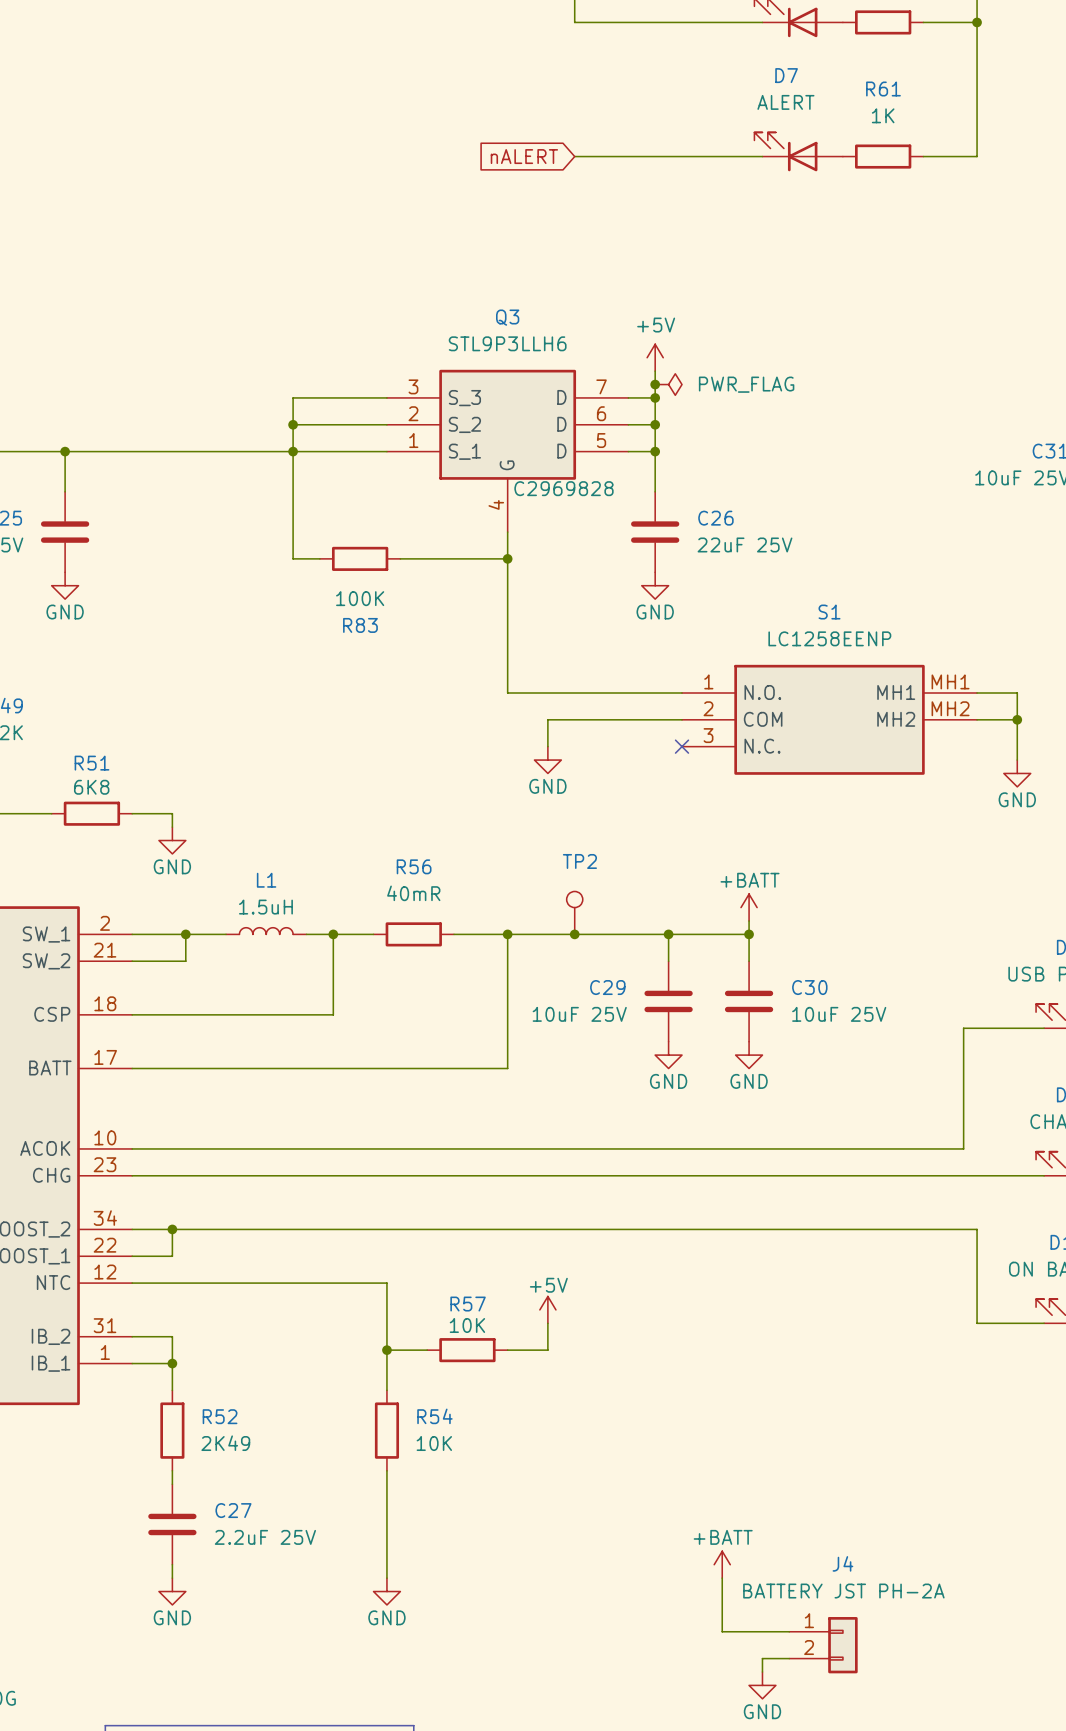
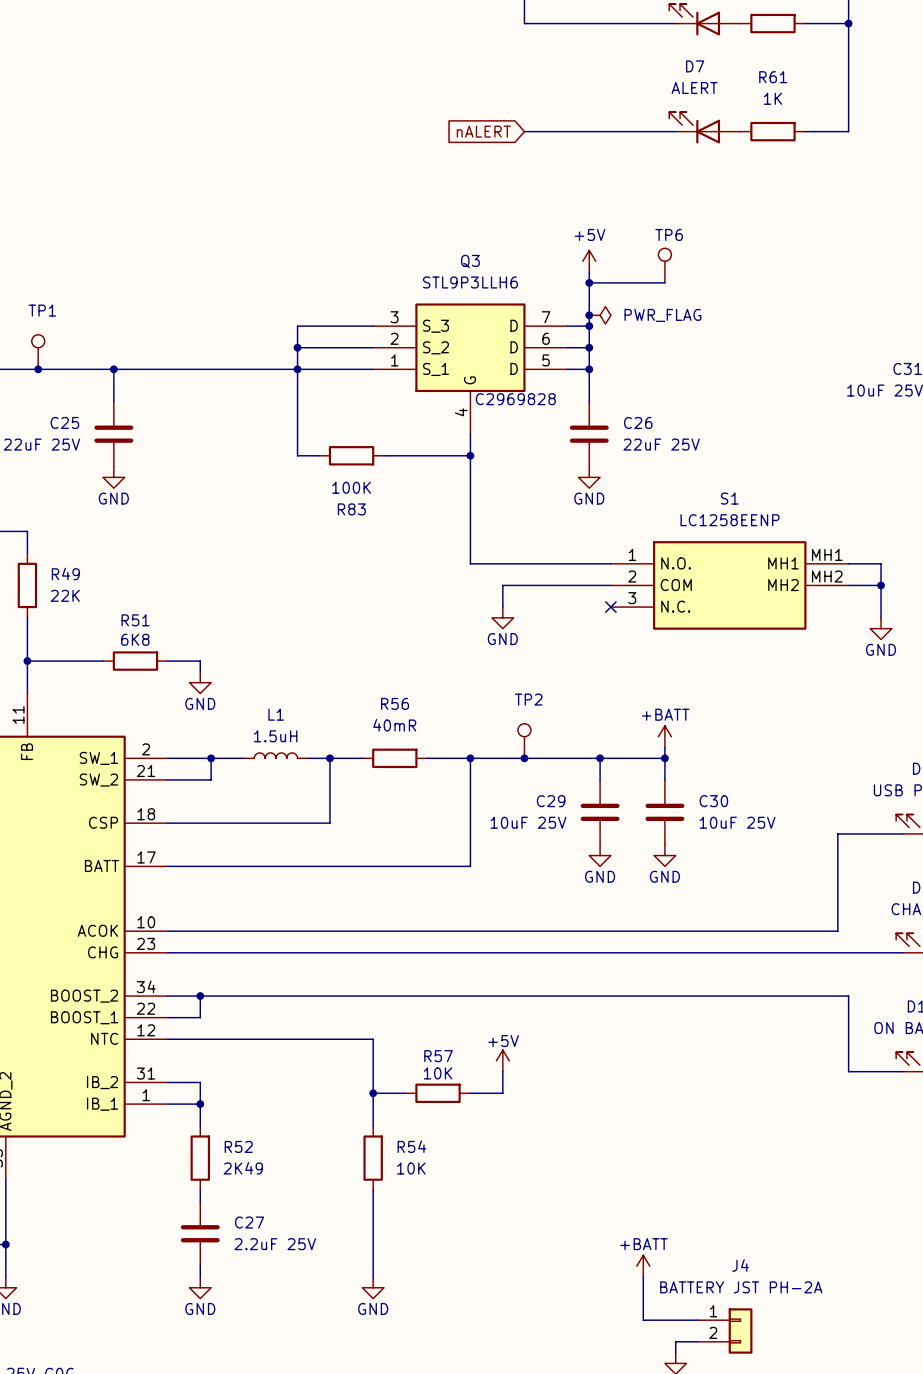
TP6: none -> (664, 265)
wire: none -> (589, 282) (664, 282)
junction: none -> (589, 282)
power symbol position: +5V (655, 357) -> +5V (589, 261)

